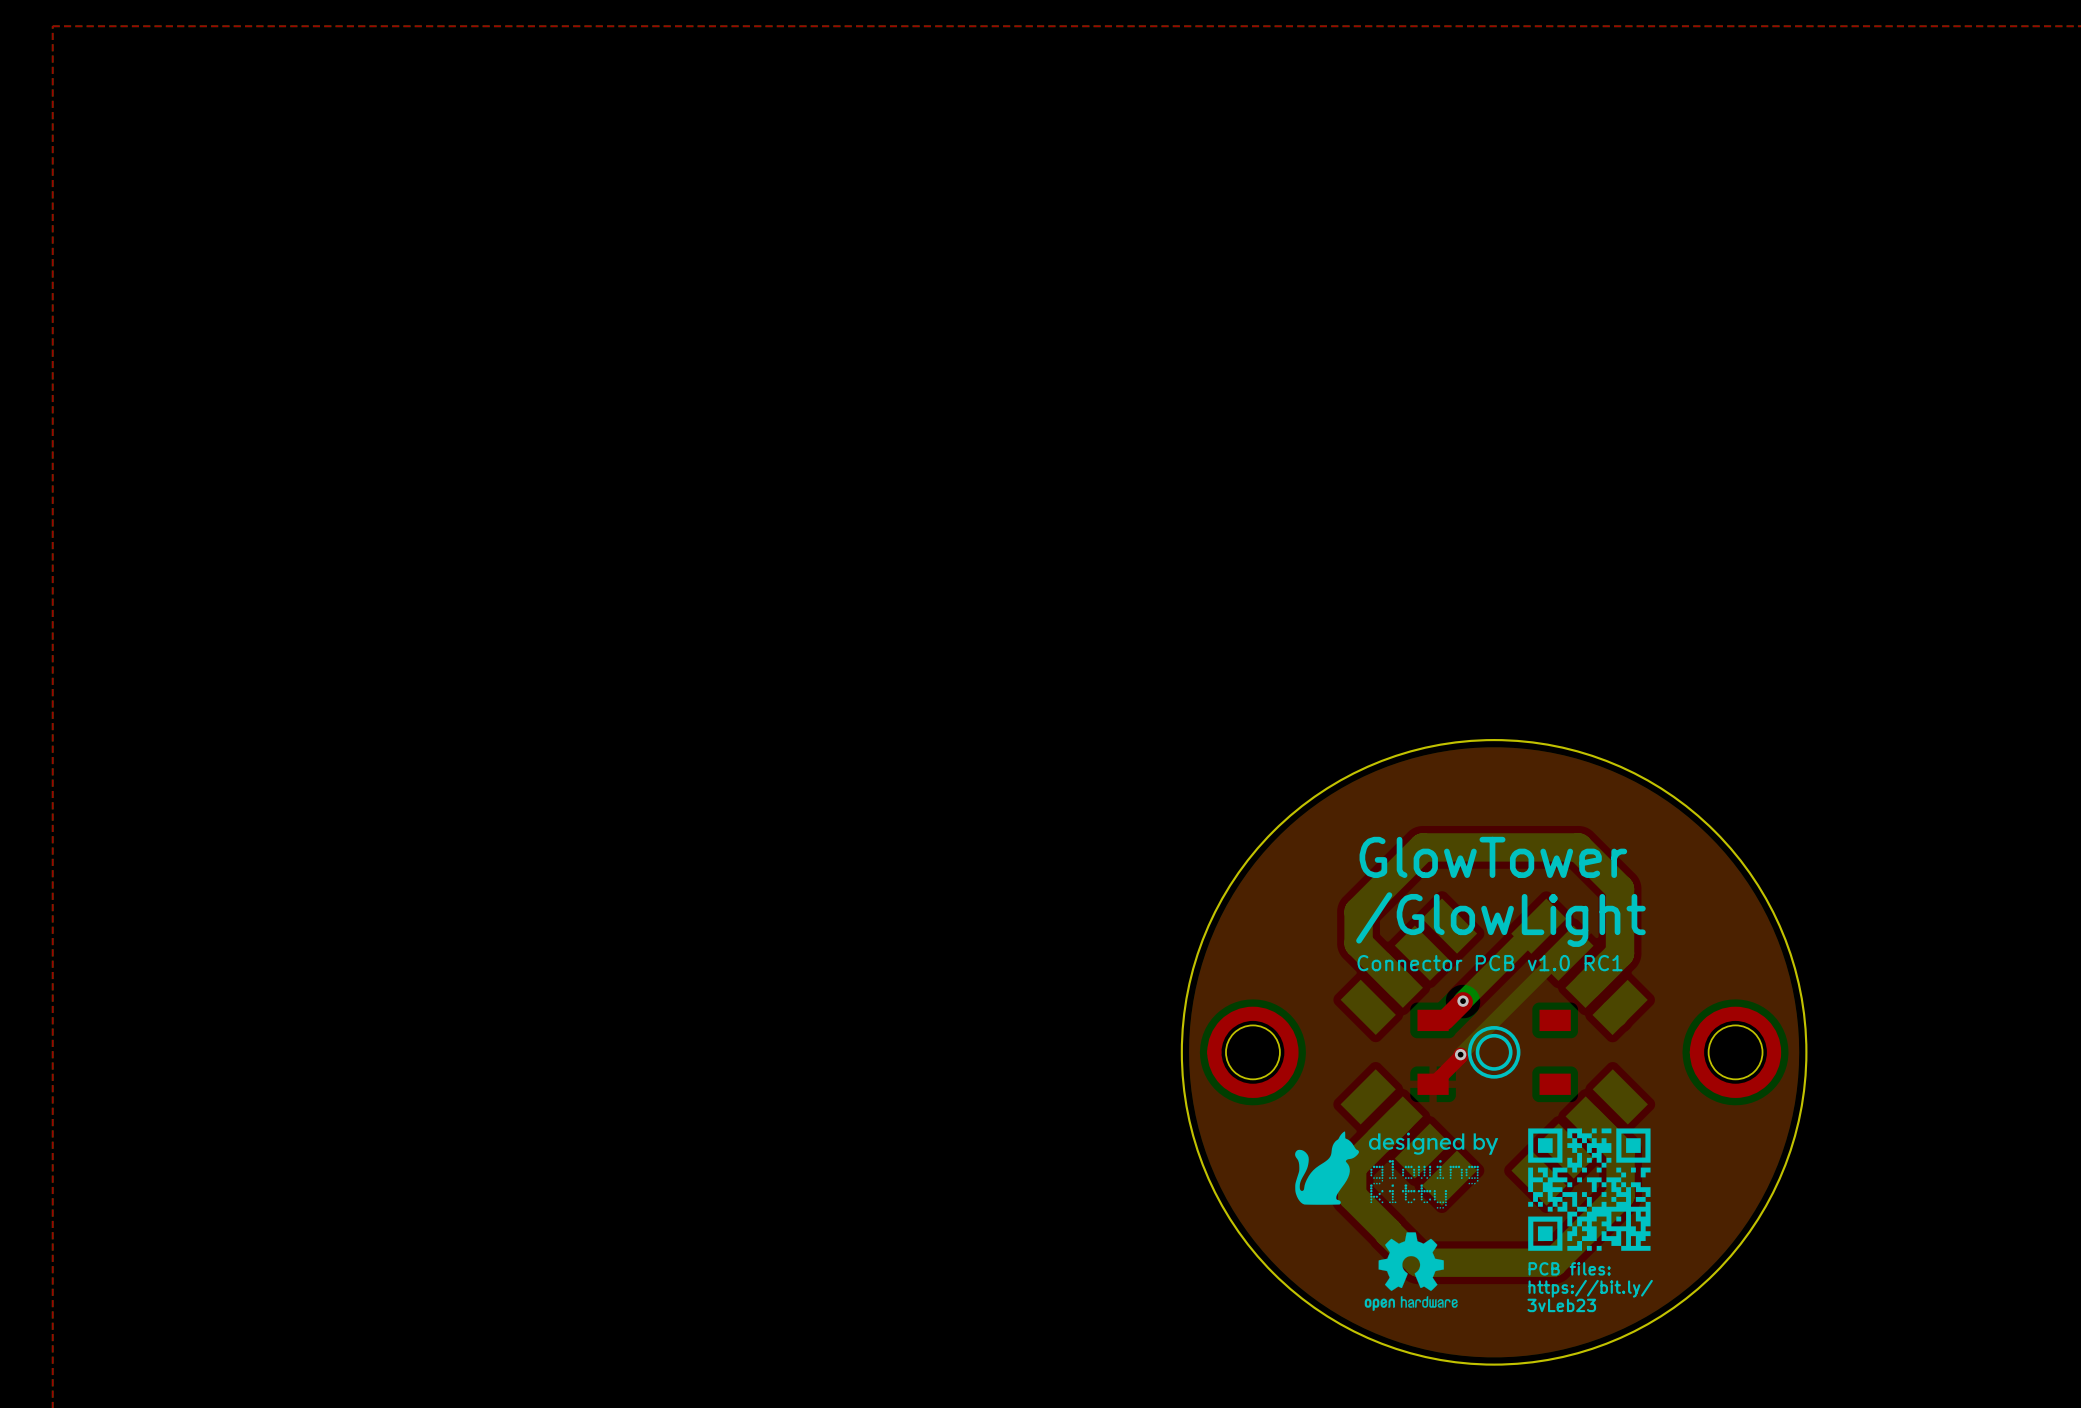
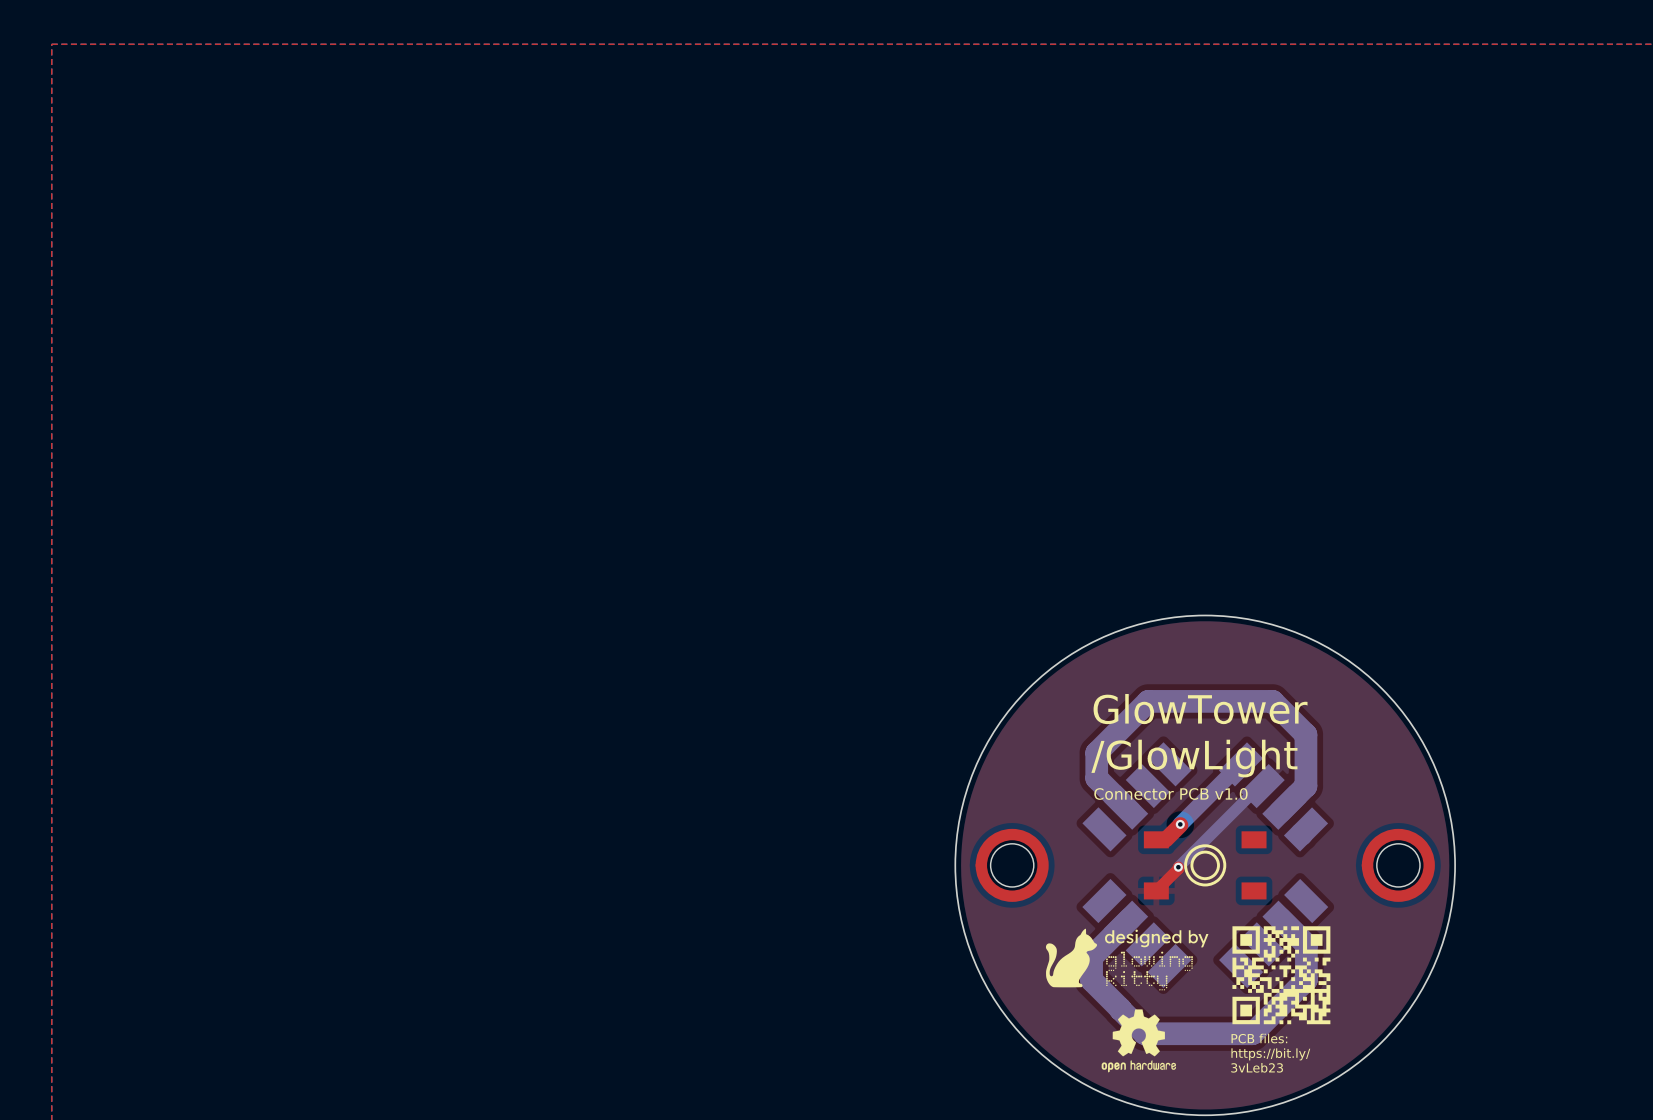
text: Connector PCB v1.0 RC1 (1490, 963) -> Connector PCB v1.0 (1170, 793)

